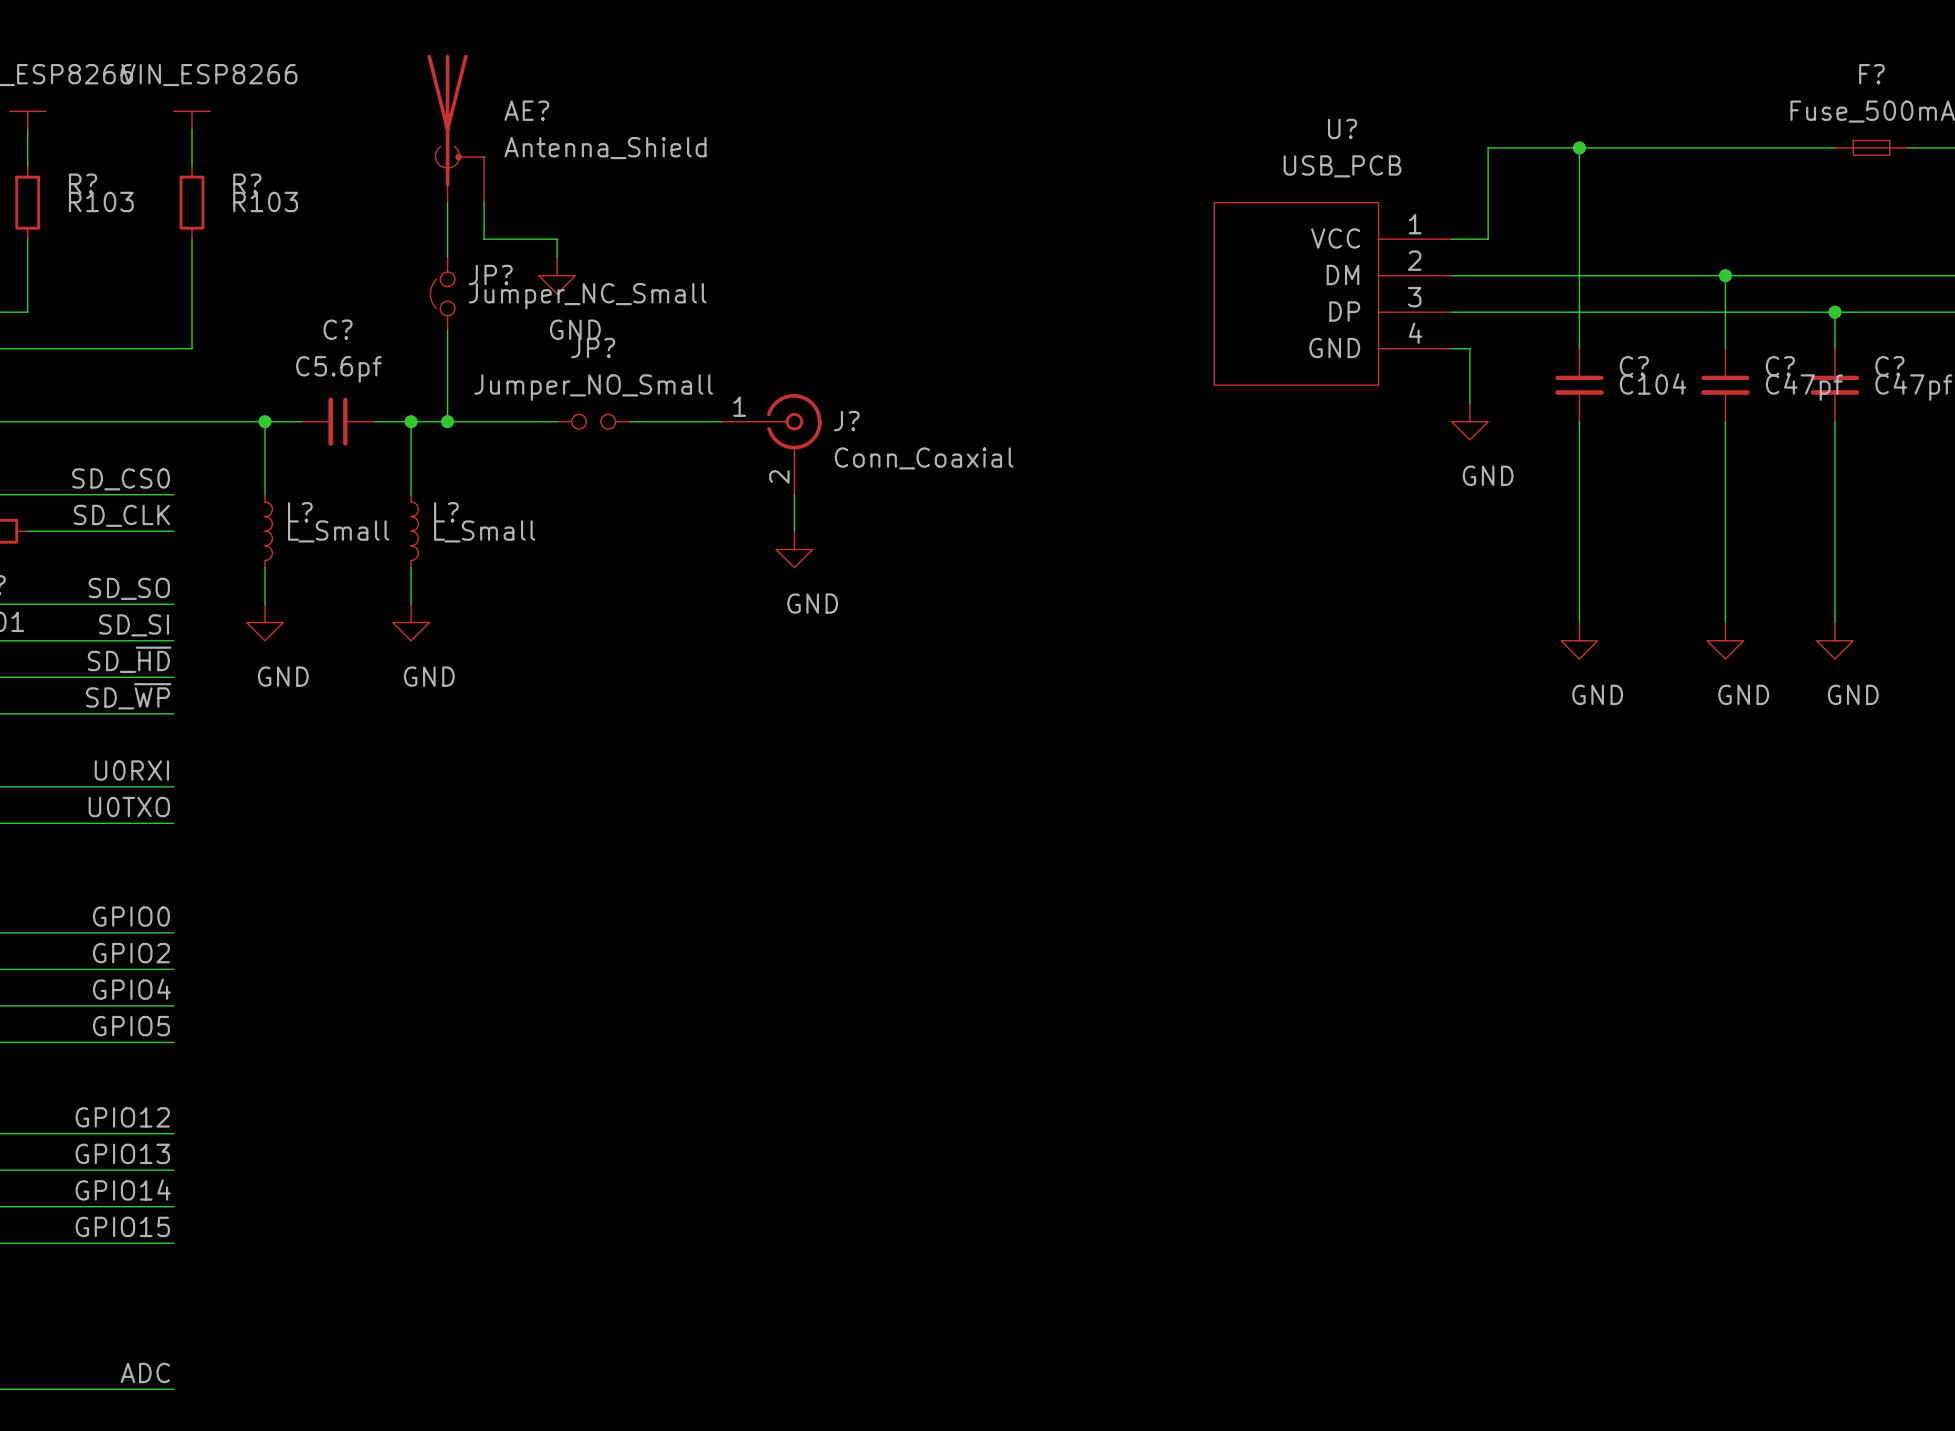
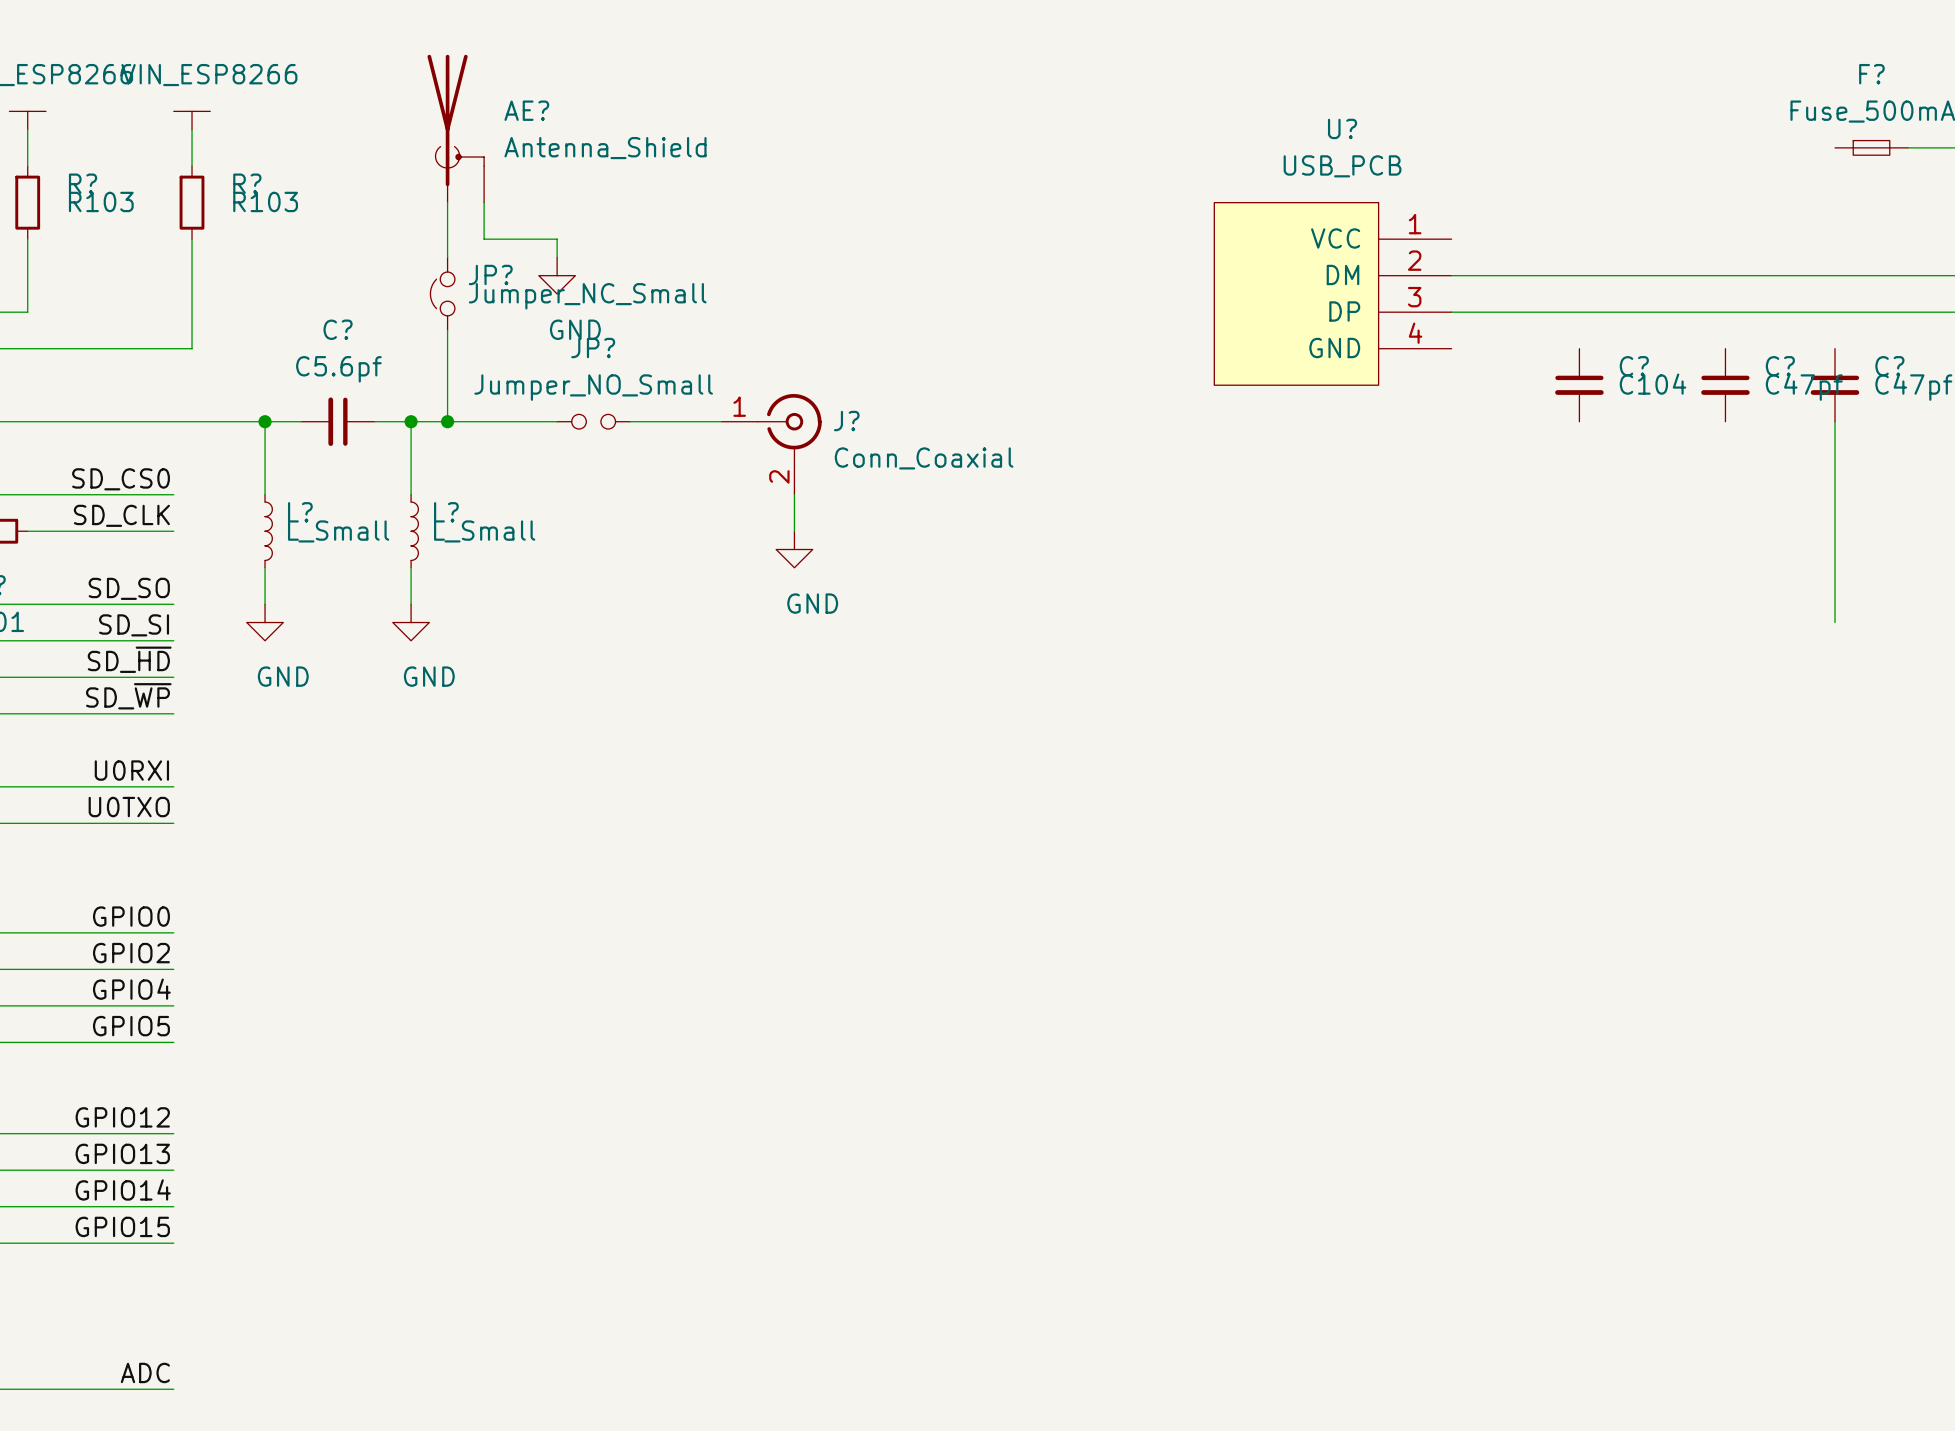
wire: (1579, 147) (1579, 348) -> none
junction: (1579, 147) -> none
wire: (1834, 147) (1488, 147) (1488, 239) (1451, 239) -> none
wire: (1725, 275) (1725, 348) -> none
junction: (1725, 275) -> none
wire: (1834, 312) (1834, 348) -> none
junction: (1834, 312) -> none
wire: (1451, 348) (1469, 348) (1469, 403) -> none
power symbol: GND (1469, 421) -> none
wire: (1579, 421) (1579, 622) -> none
wire: (1725, 421) (1725, 622) -> none
power symbol: GND (1579, 640) -> none
power symbol: GND (1725, 640) -> none
power symbol: GND (1834, 640) -> none

